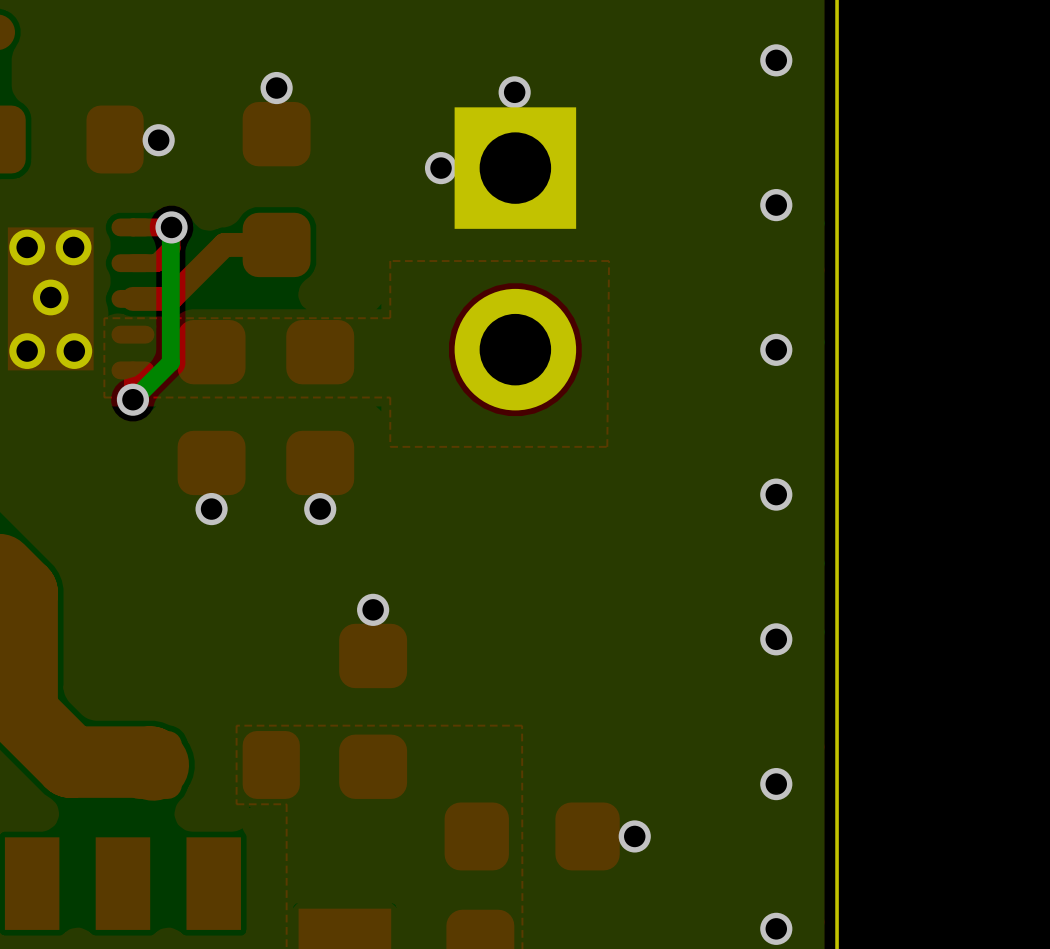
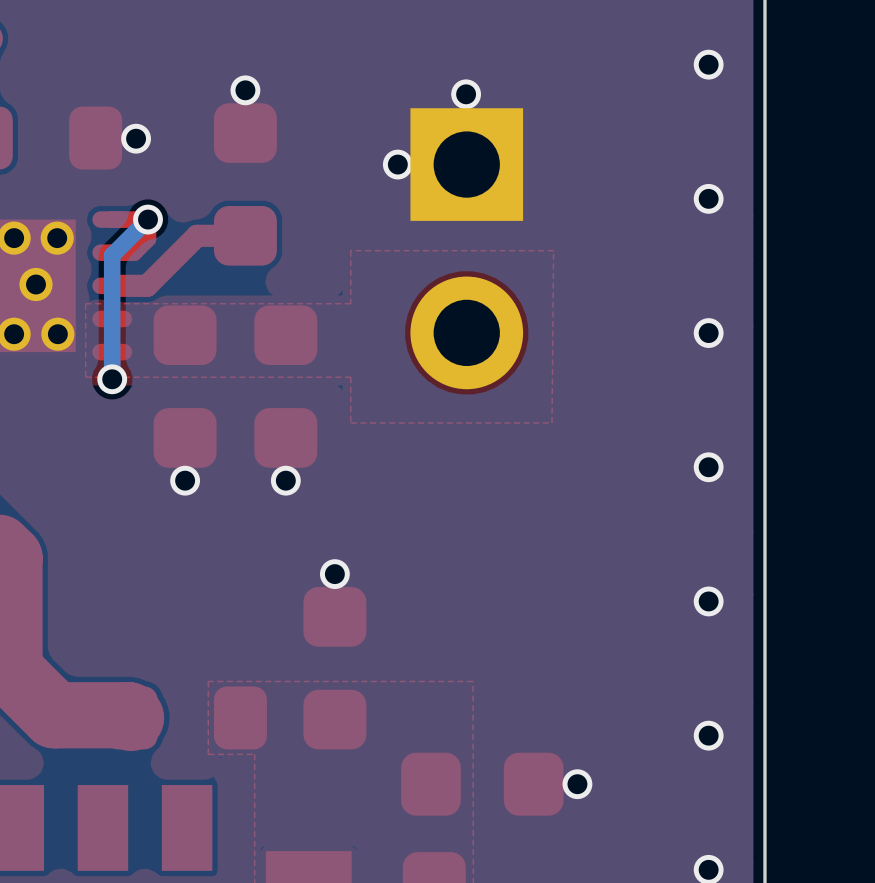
bottom track: (170, 228) (170, 362) (133, 399) -> (147, 220) (112, 255) (112, 379)

